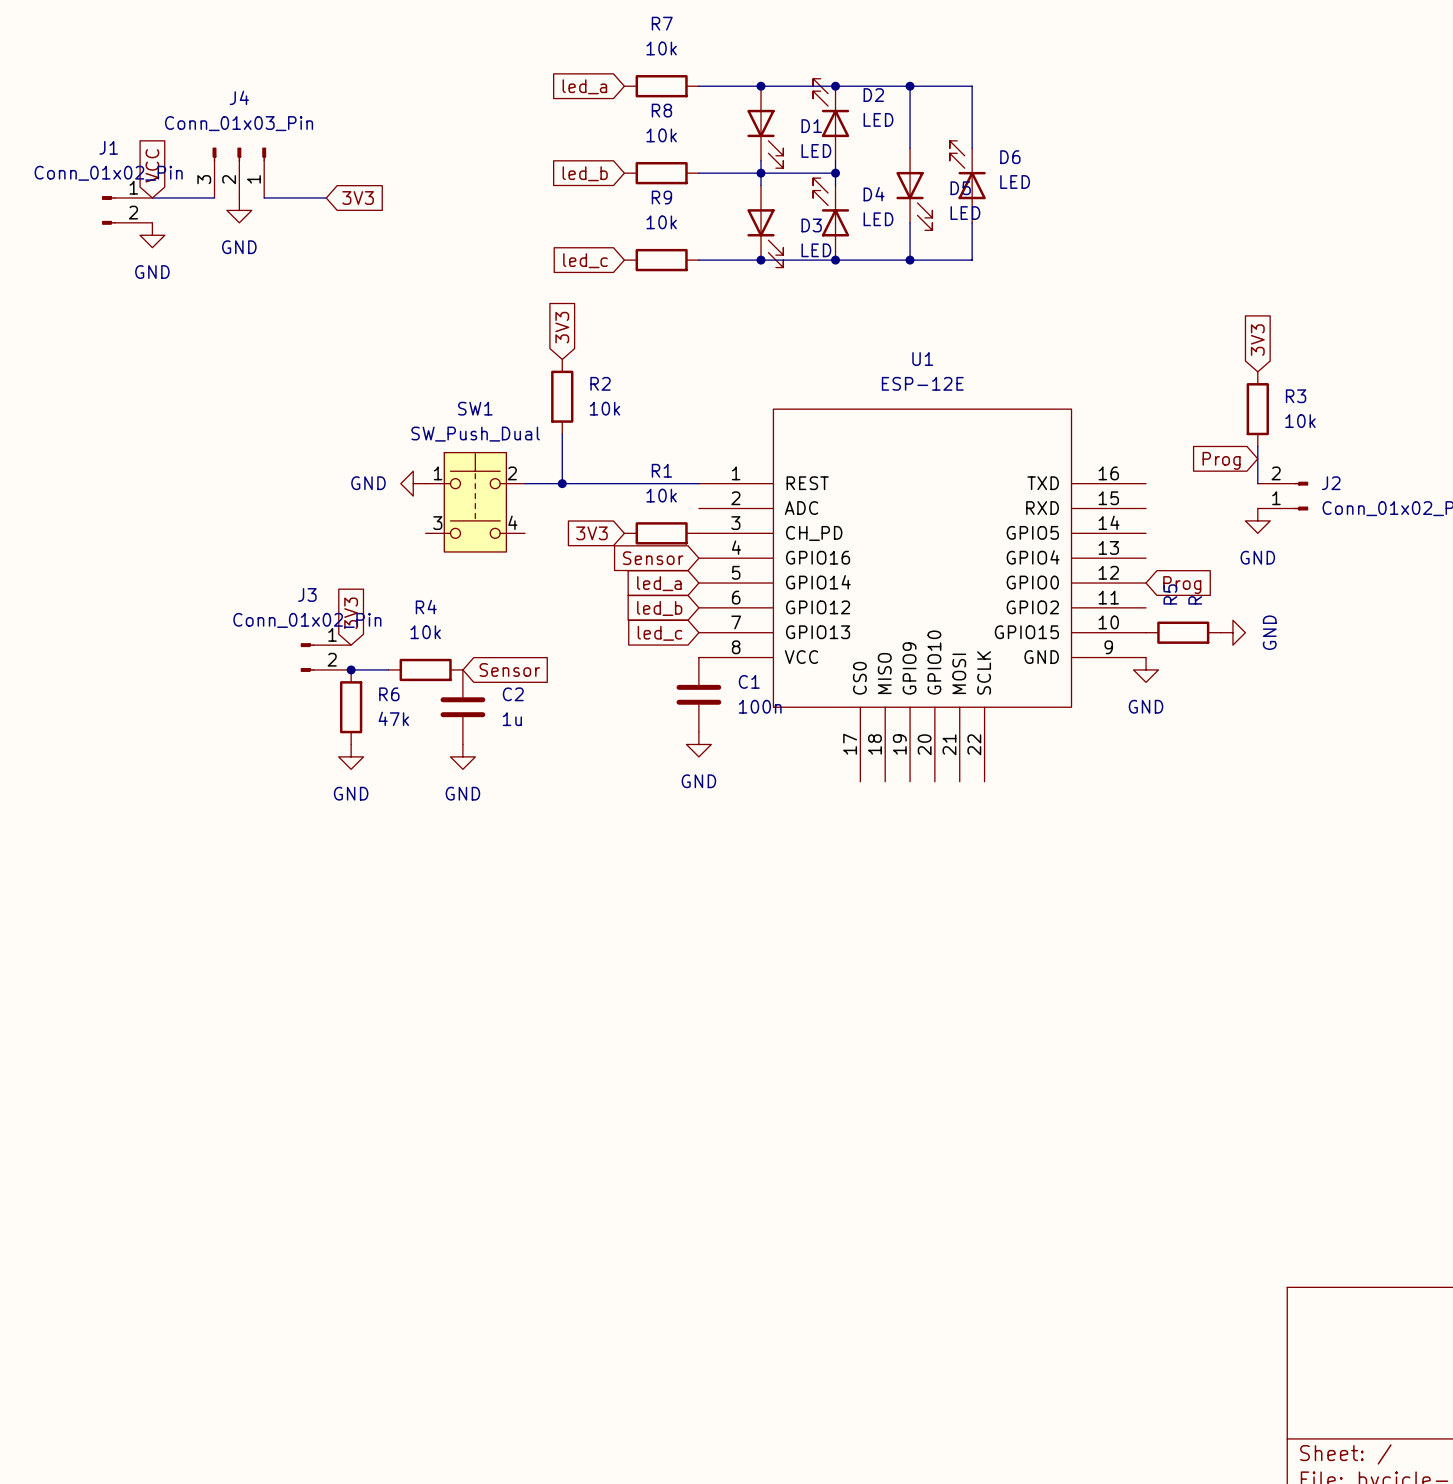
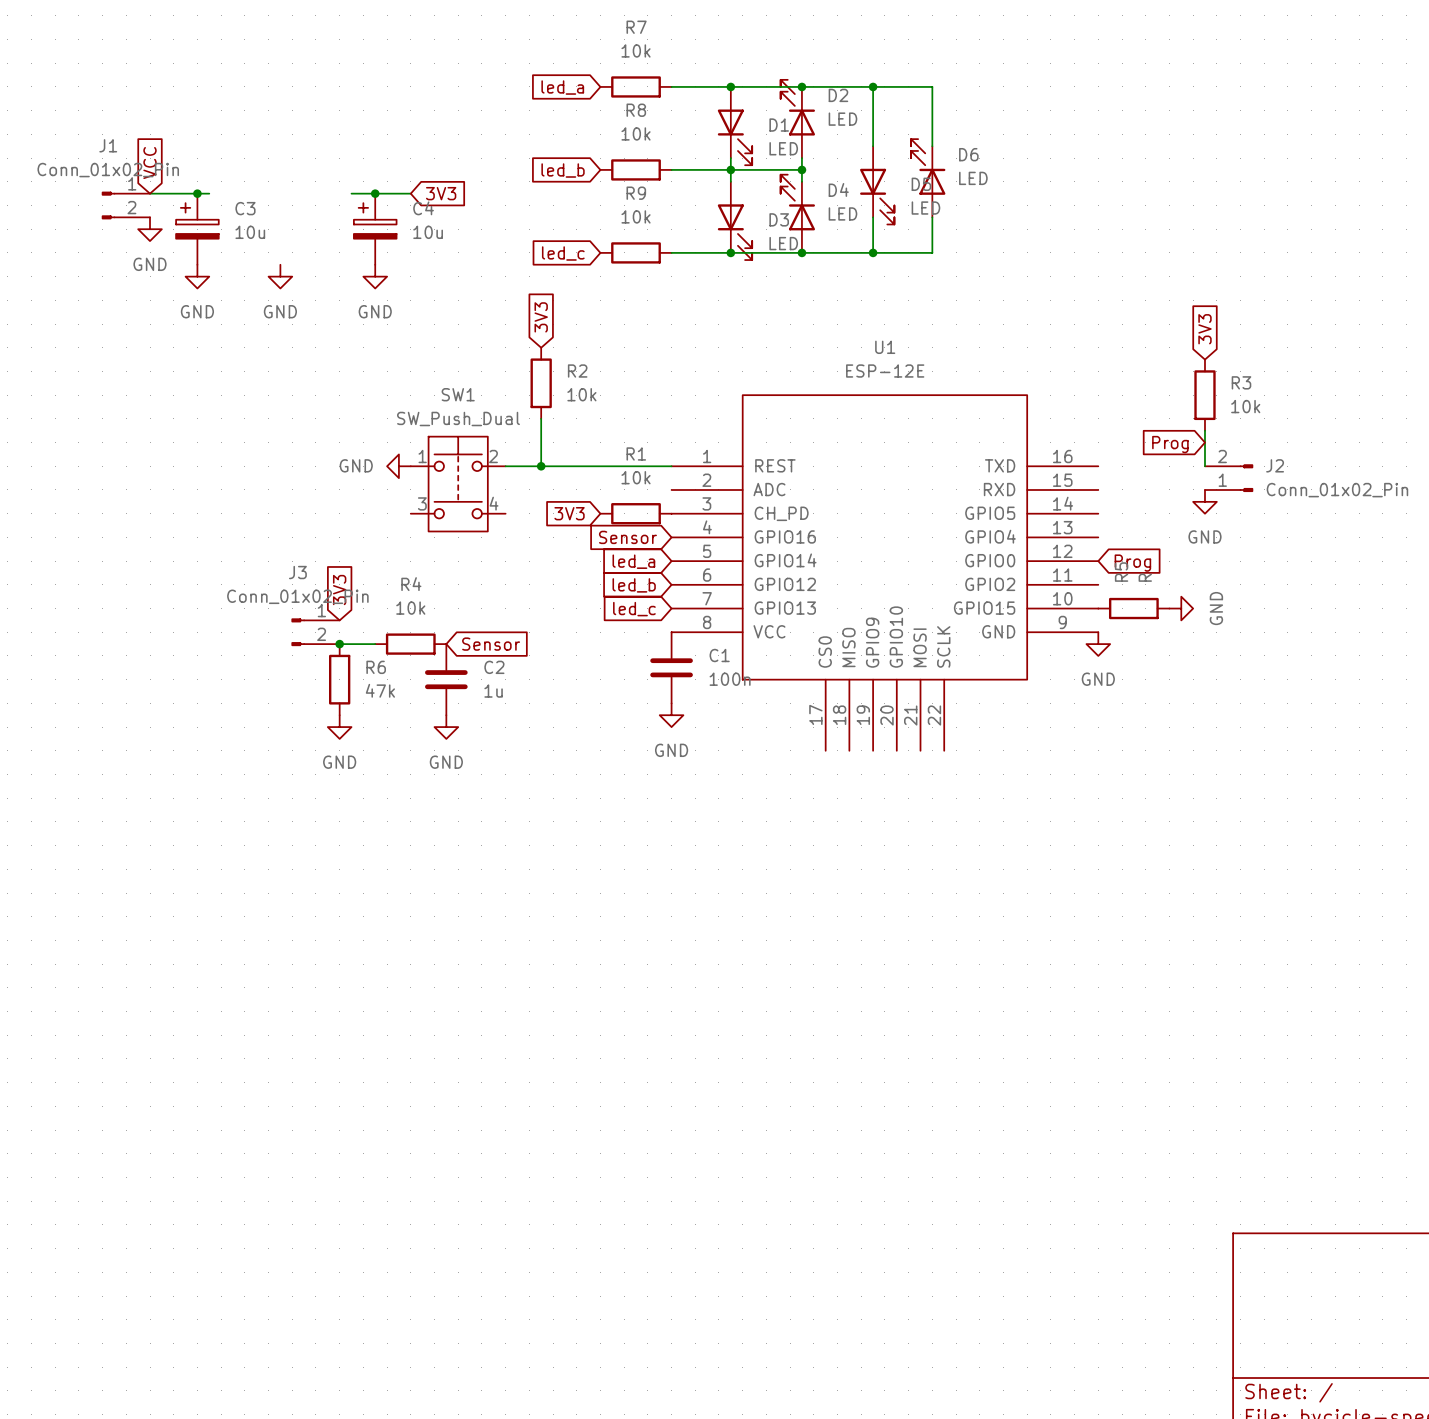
J4: Conn_01x03_Pin (239, 172) -> none
junction: none -> (197, 193)
wire: (264, 197) (326, 197) -> (351, 193) (410, 193)
global label position: 3V3 (358, 197) -> 3V3 (441, 193)
junction: none -> (375, 193)
power symbol: GND (239, 210) -> none
C3: none -> 10u (197, 229)
C4: none -> 10u (375, 229)
power symbol: none -> GND (197, 276)
power symbol: none -> GND (280, 276)
power symbol: none -> GND (375, 276)

